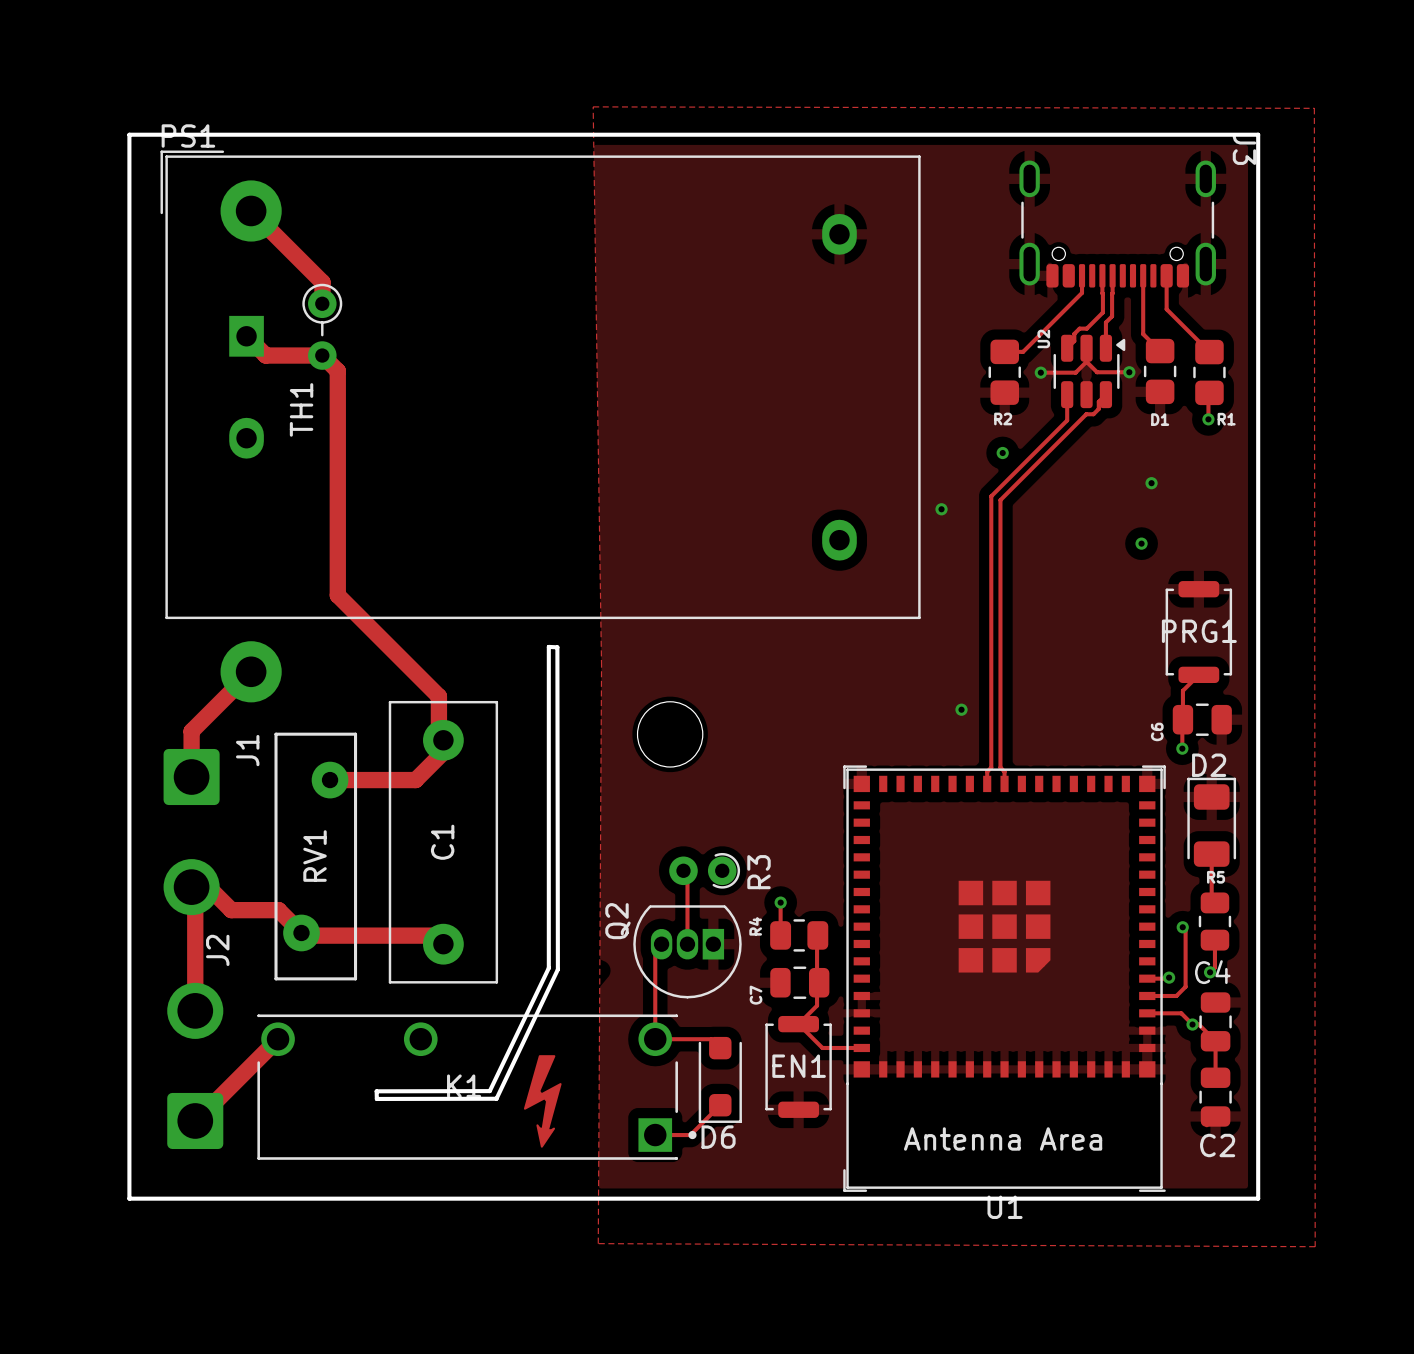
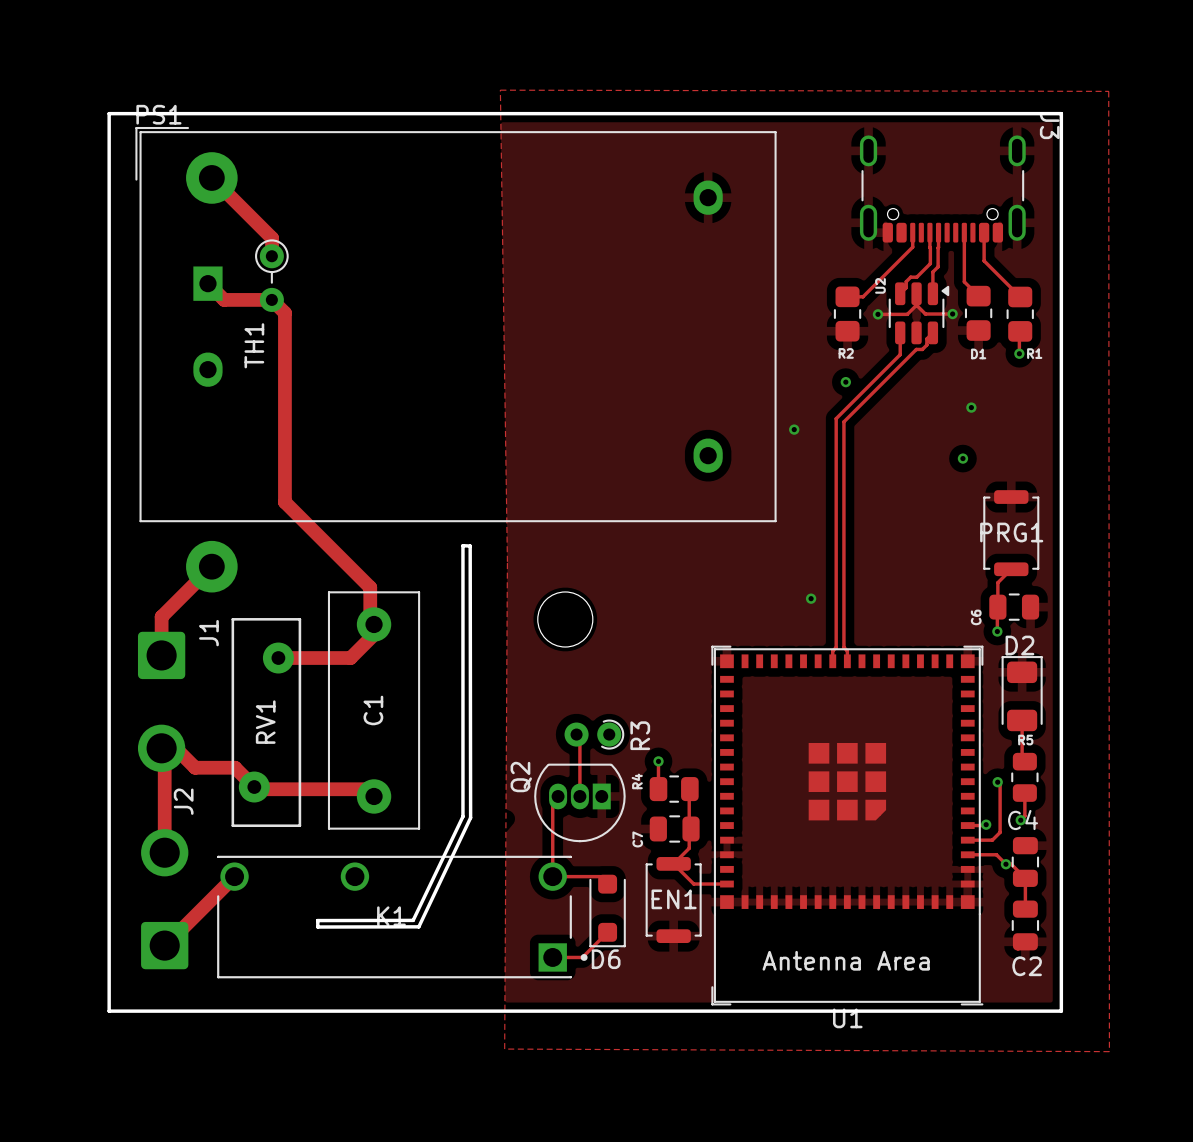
drawing: [523, 1055, 562, 1148] -> none

